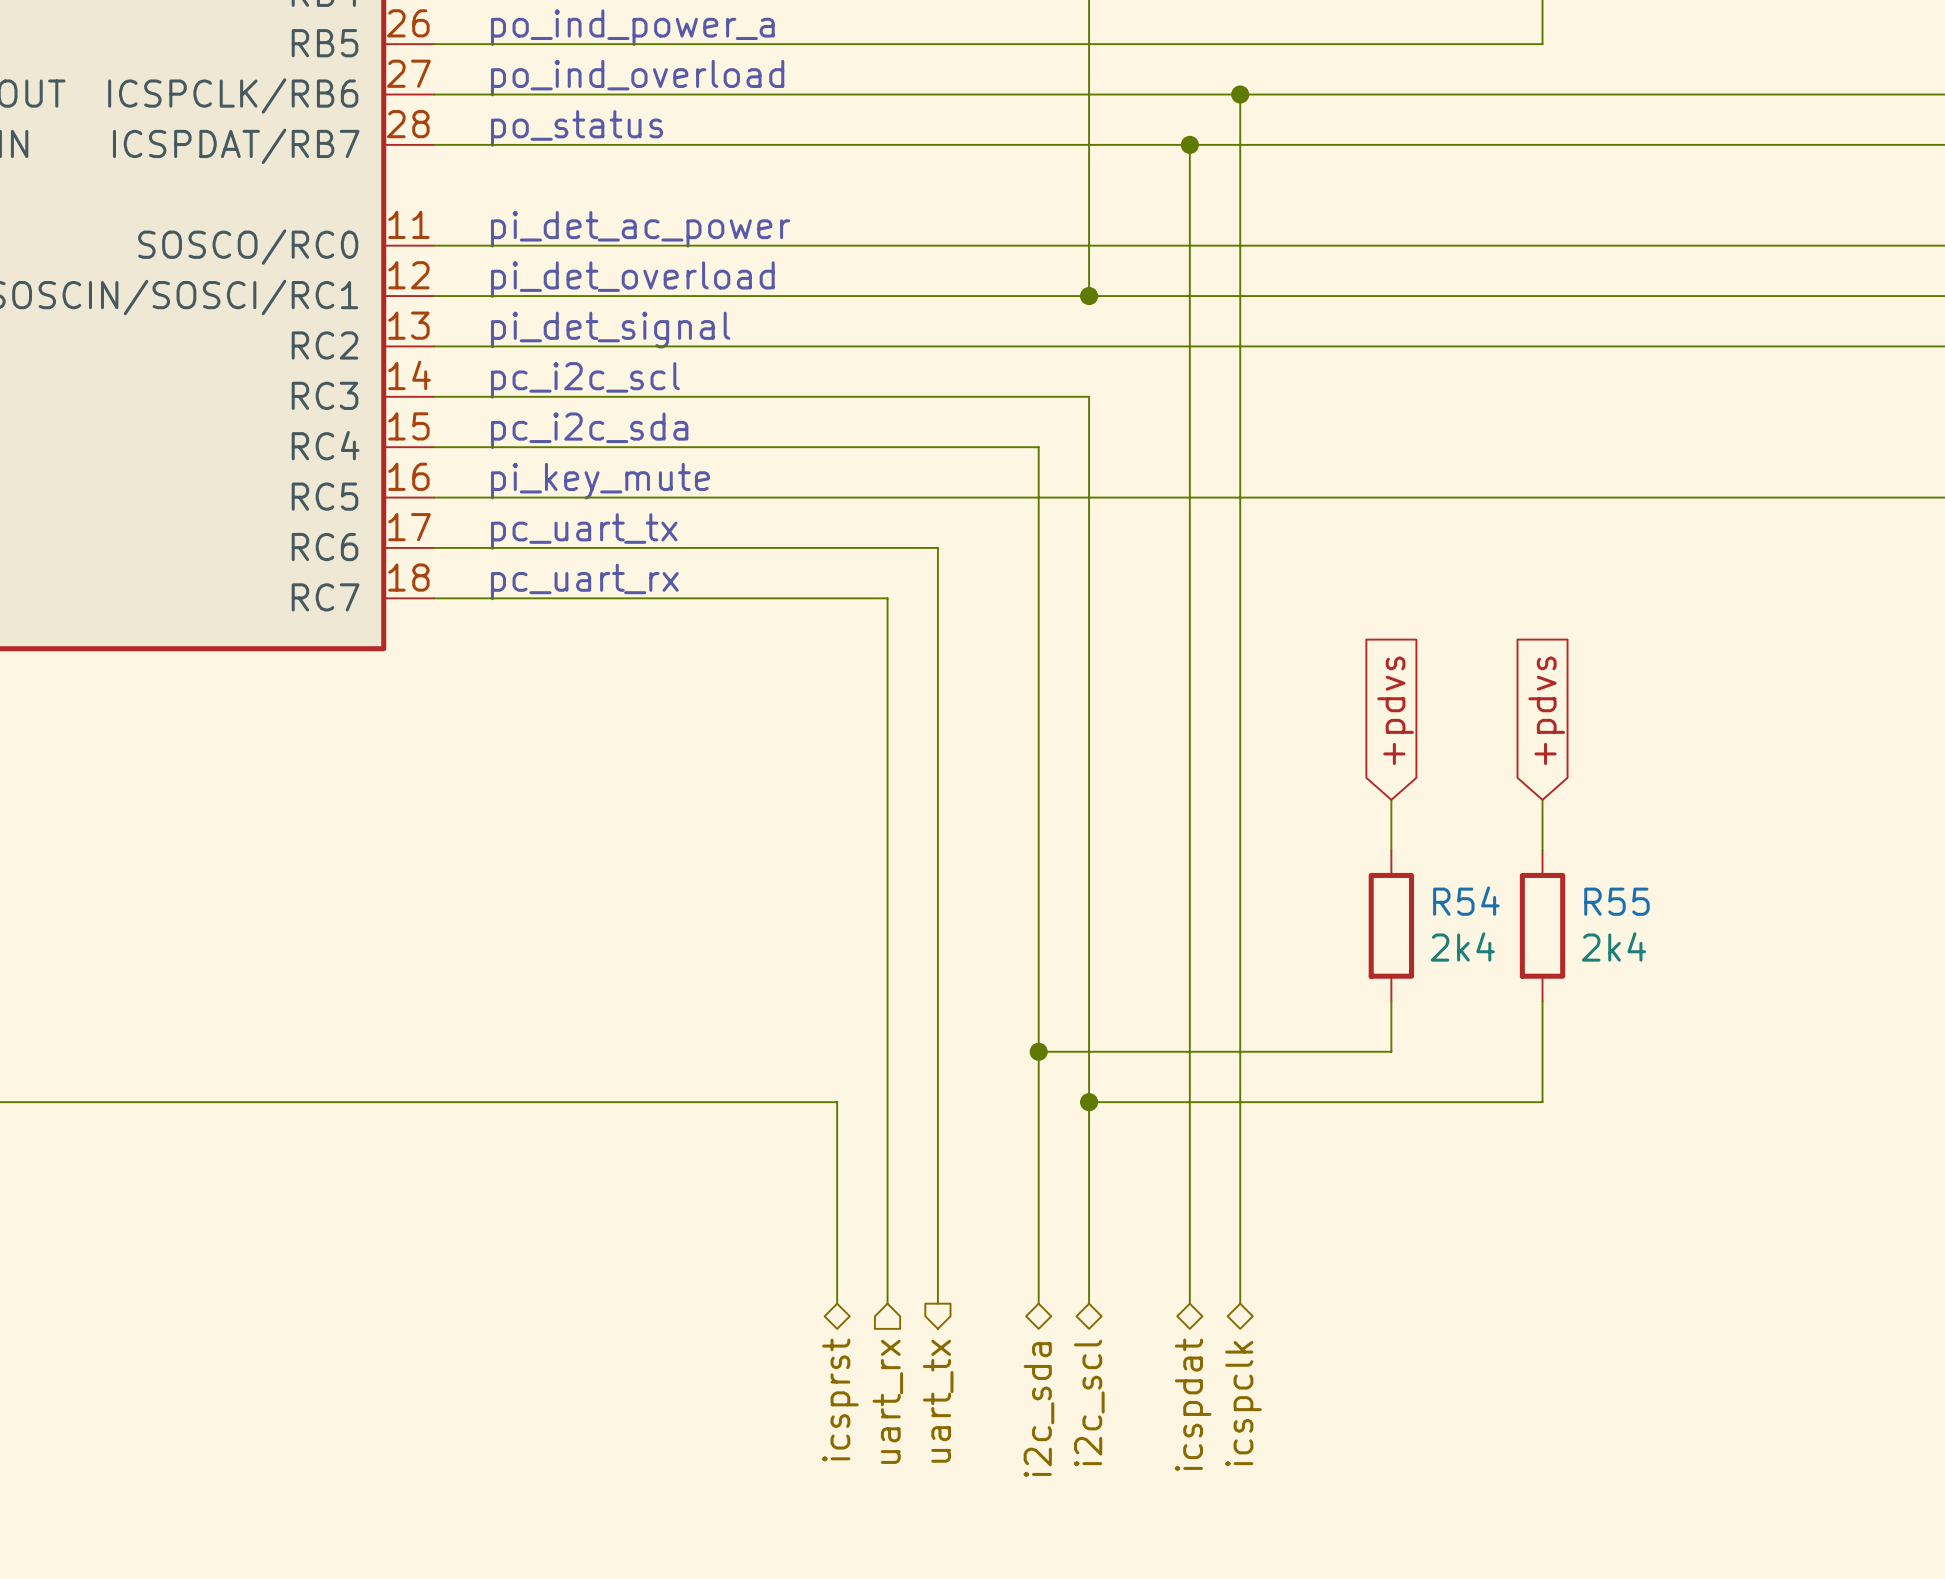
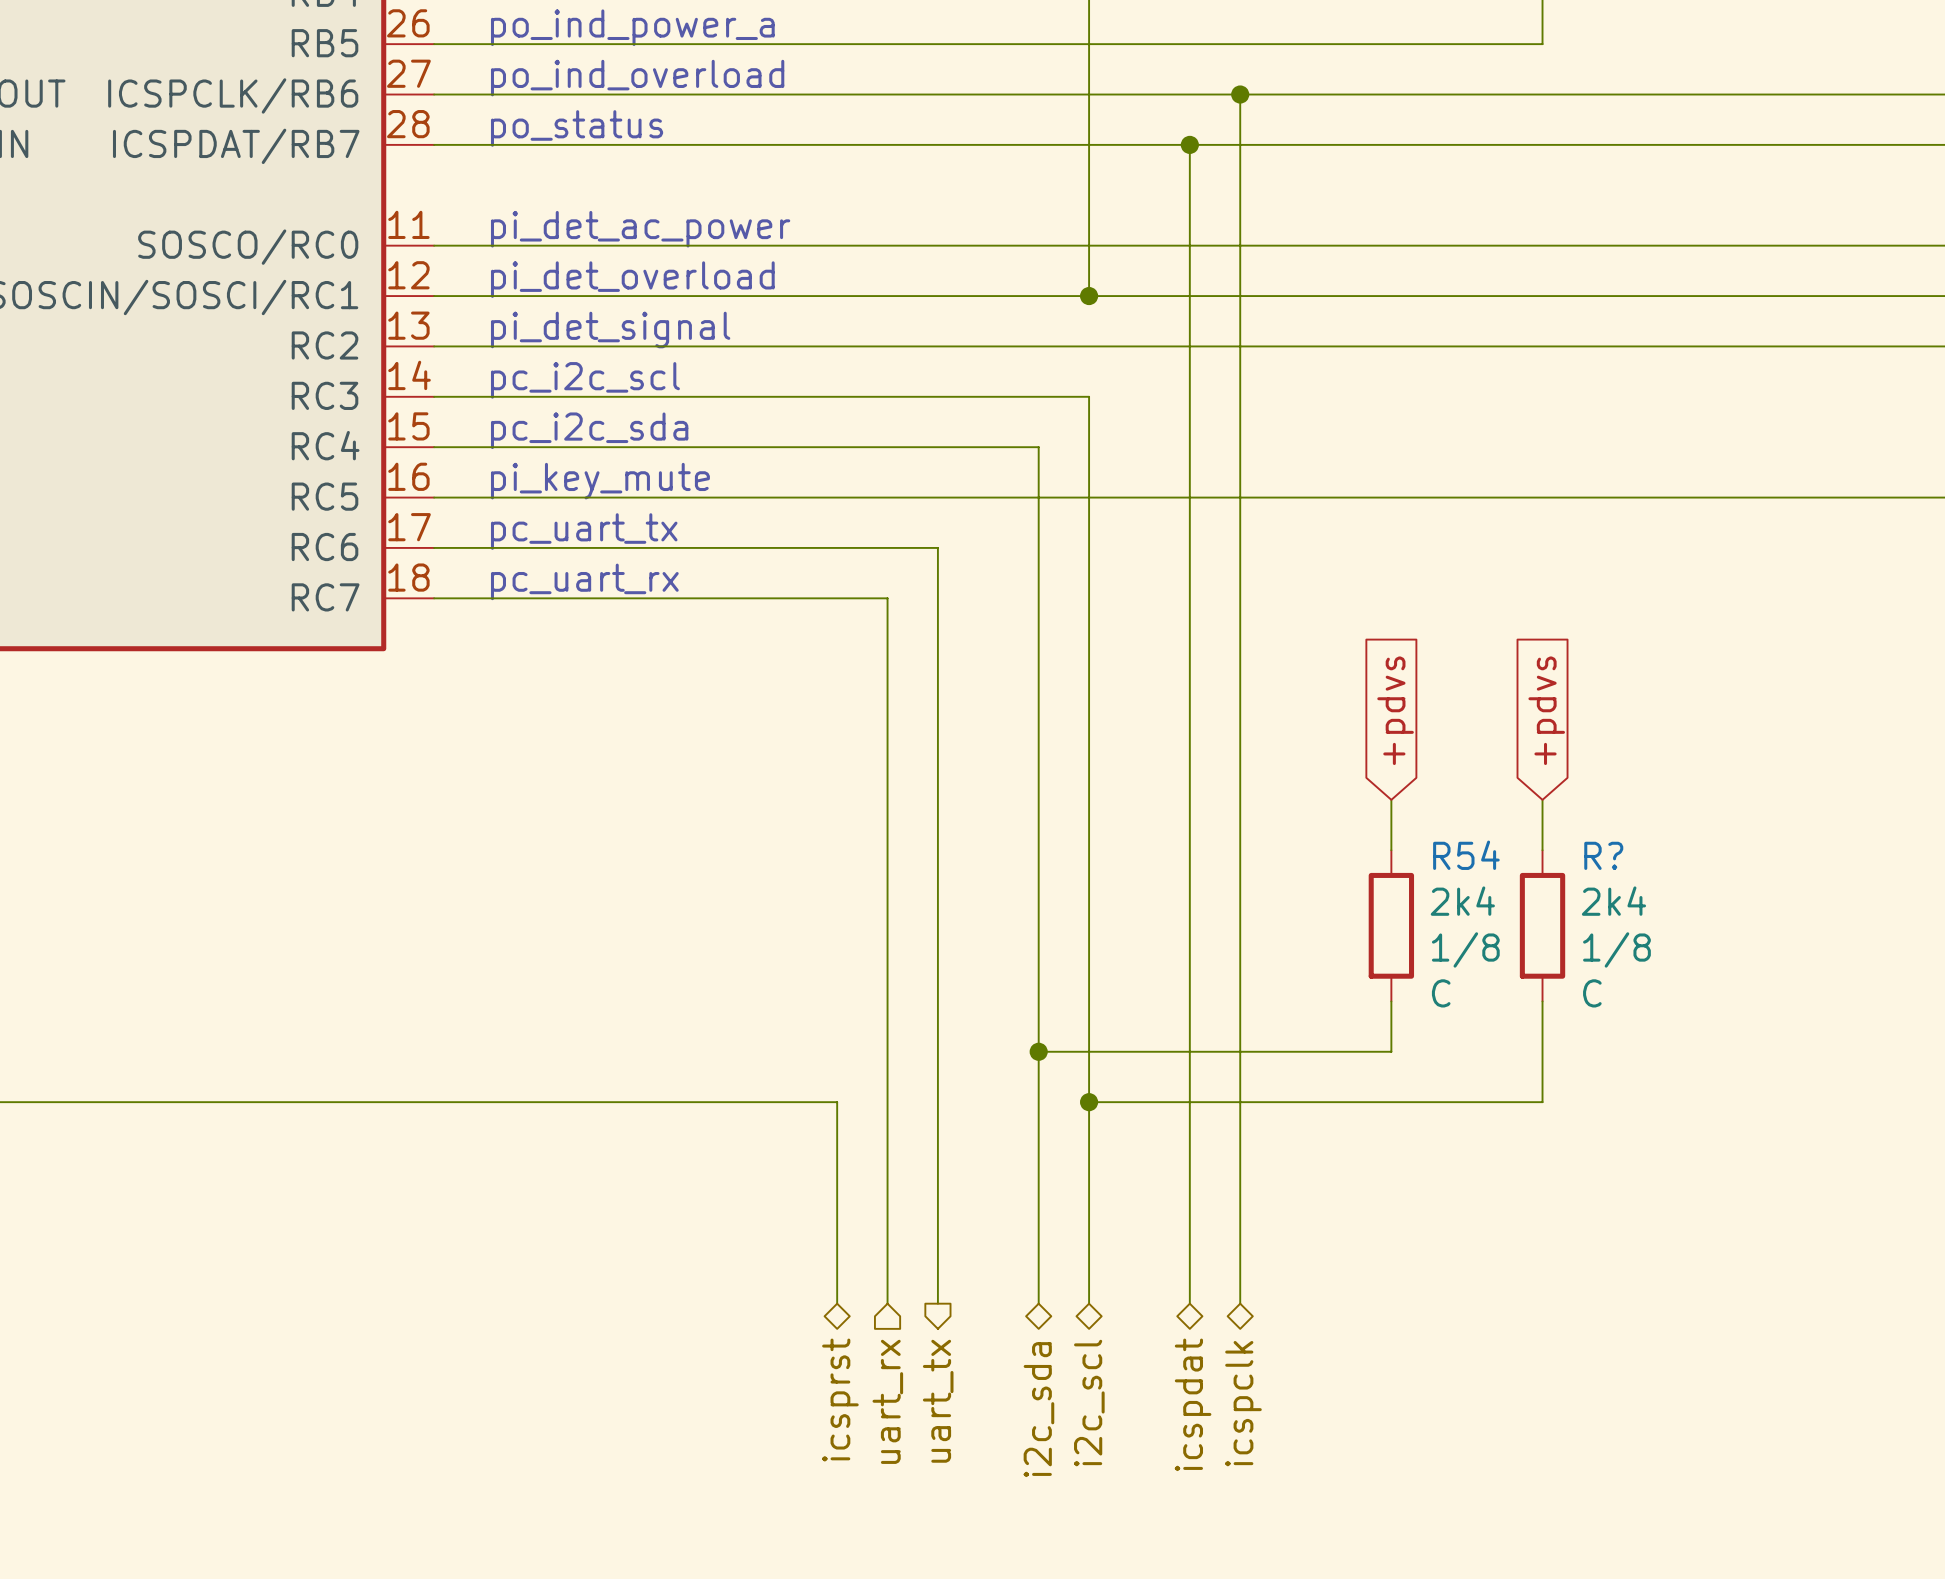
R54 name position: R54 (1466, 901) -> R54 (1466, 855)
R55 name: R55 (1616, 901) -> R? (1603, 855)
R54 value position: 2k4 (1462, 946) -> 2k4 (1462, 901)
R55 value position: 2k4 (1613, 946) -> 2k4 (1613, 901)
R54 text: none -> 1/8 (1465, 949)
R55 text: none -> 1/8 (1616, 949)
R54 text: none -> C (1441, 993)
R55 text: none -> C (1592, 993)

